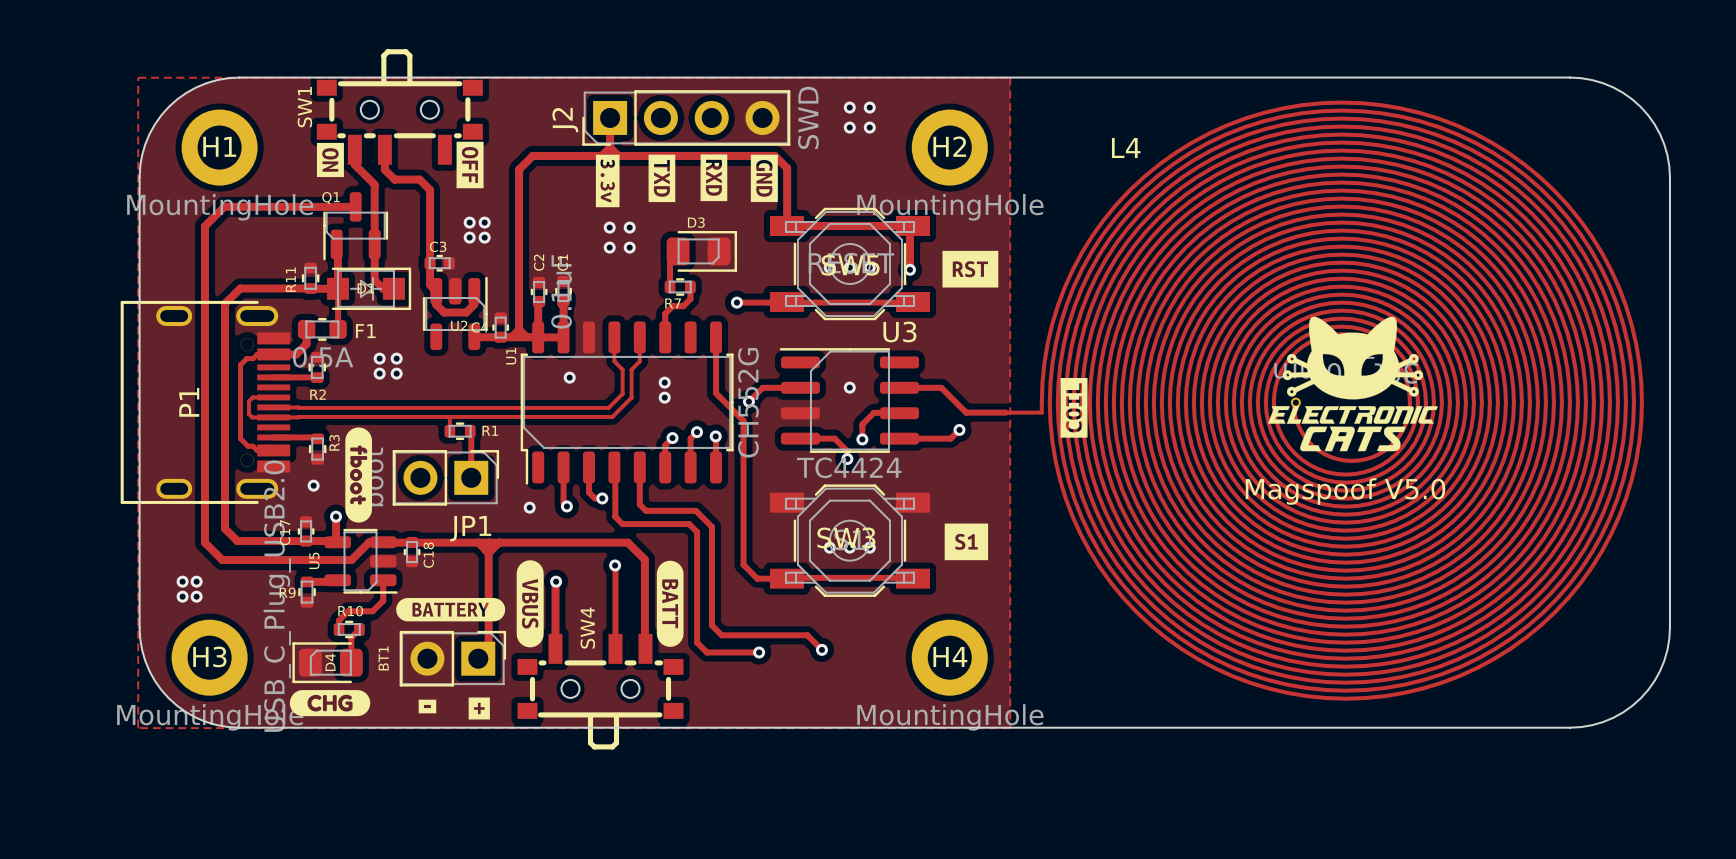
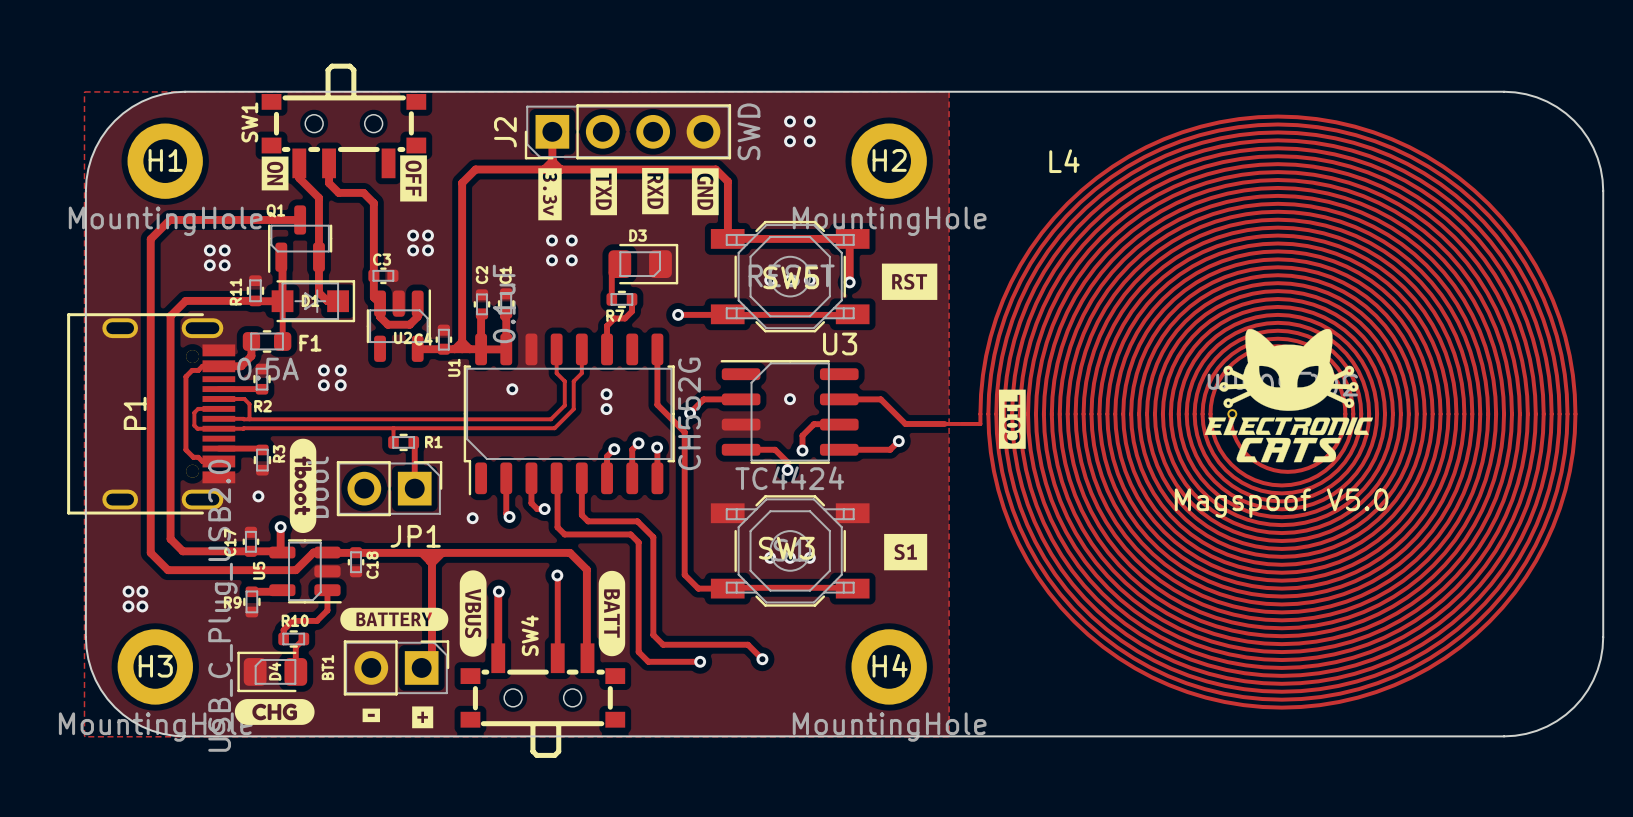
via: none -> (209, 250)
via: none -> (224, 250)
via: none -> (209, 265)
via: none -> (224, 265)
track: none -> (218, 398) (244, 398) (249, 404) (249, 419)

